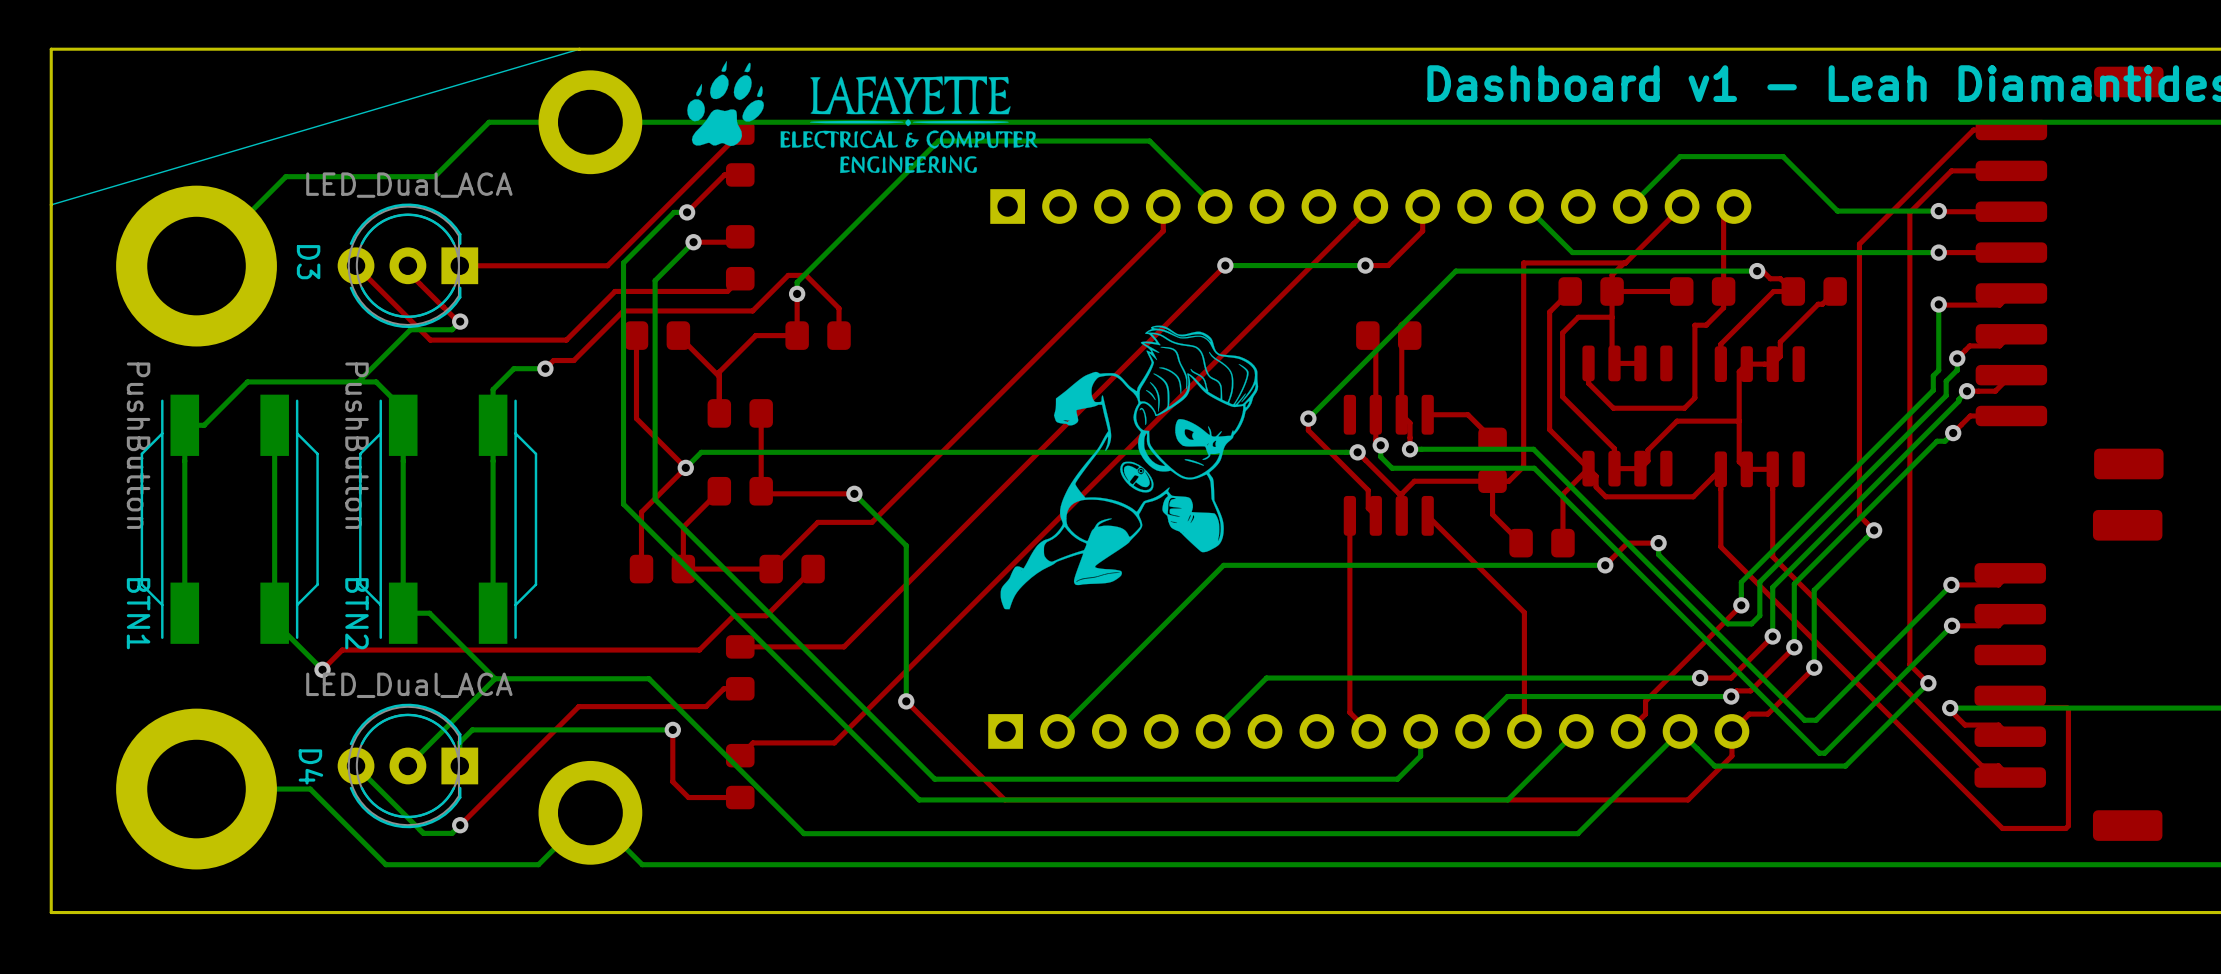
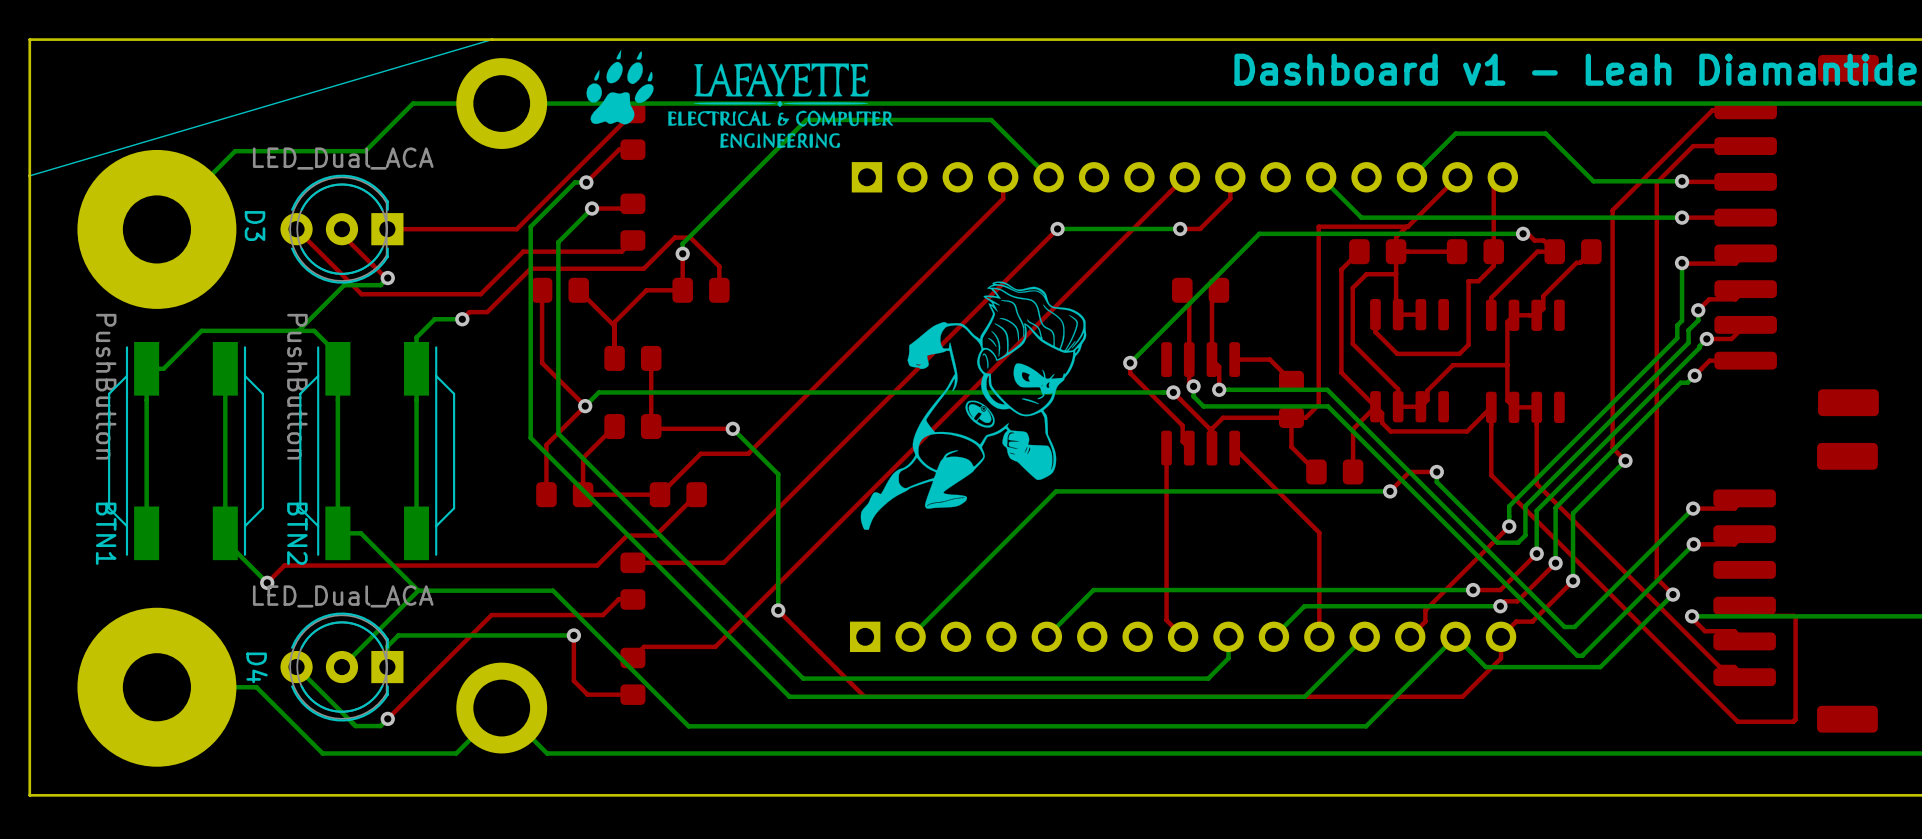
part footprint: [116, 185, 277, 347] -> [77, 149, 237, 309]
part footprint: [116, 708, 277, 870] -> [77, 607, 237, 767]

